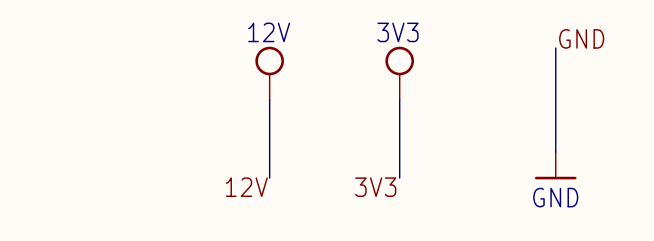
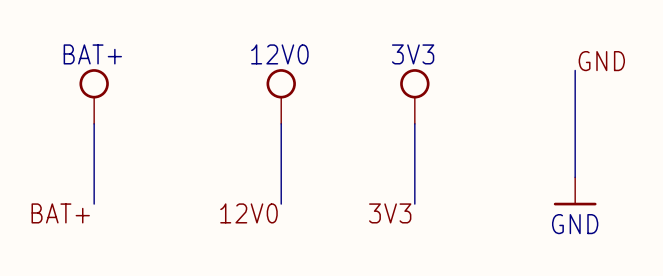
power symbol: none -> BAT+ (94, 96)
power symbol: 12V (269, 73) -> 12V0 (281, 96)
wire: none -> (94, 123) (94, 204)
label: none -> BAT+ (60, 213)
label: 12V (246, 187) -> 12V0 (248, 213)

